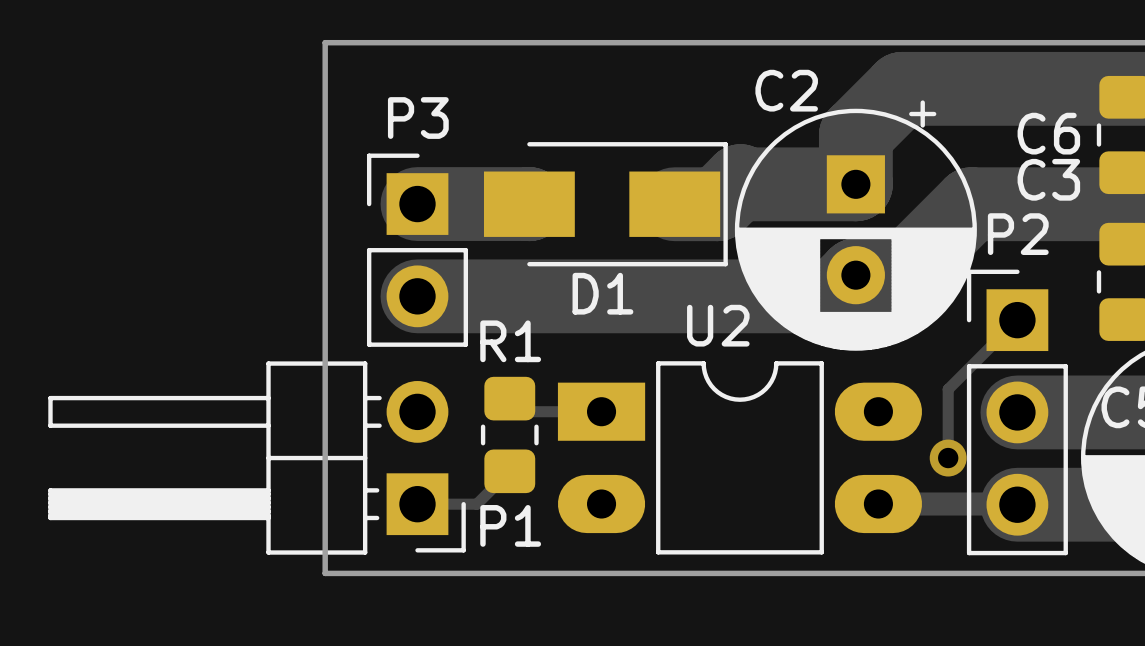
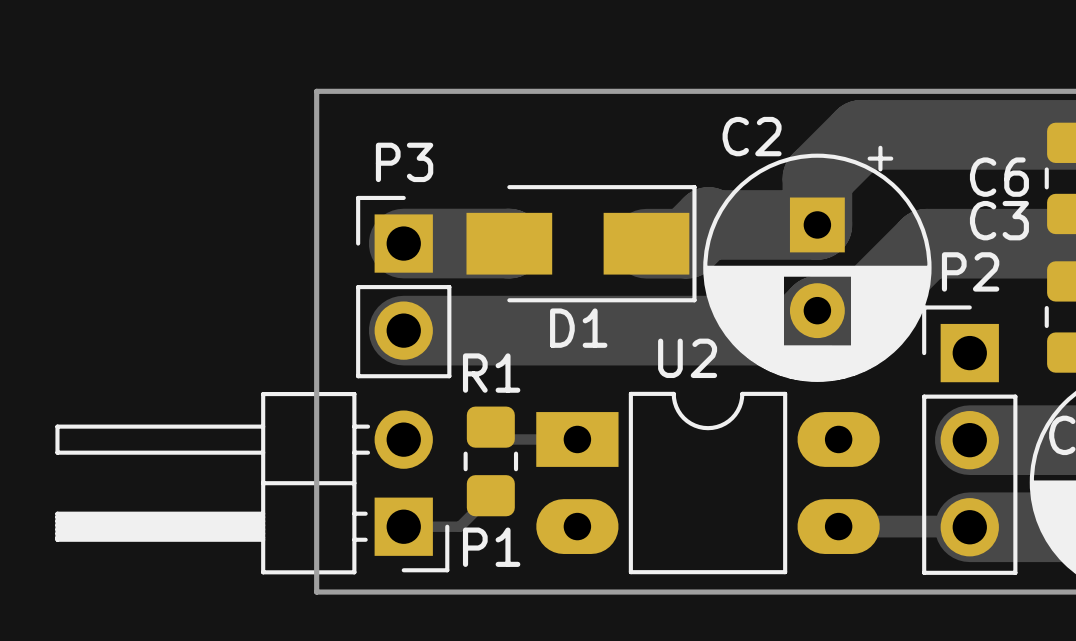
track: (1017, 320) (948, 389) (948, 458) -> none
via: (948, 458) -> none

